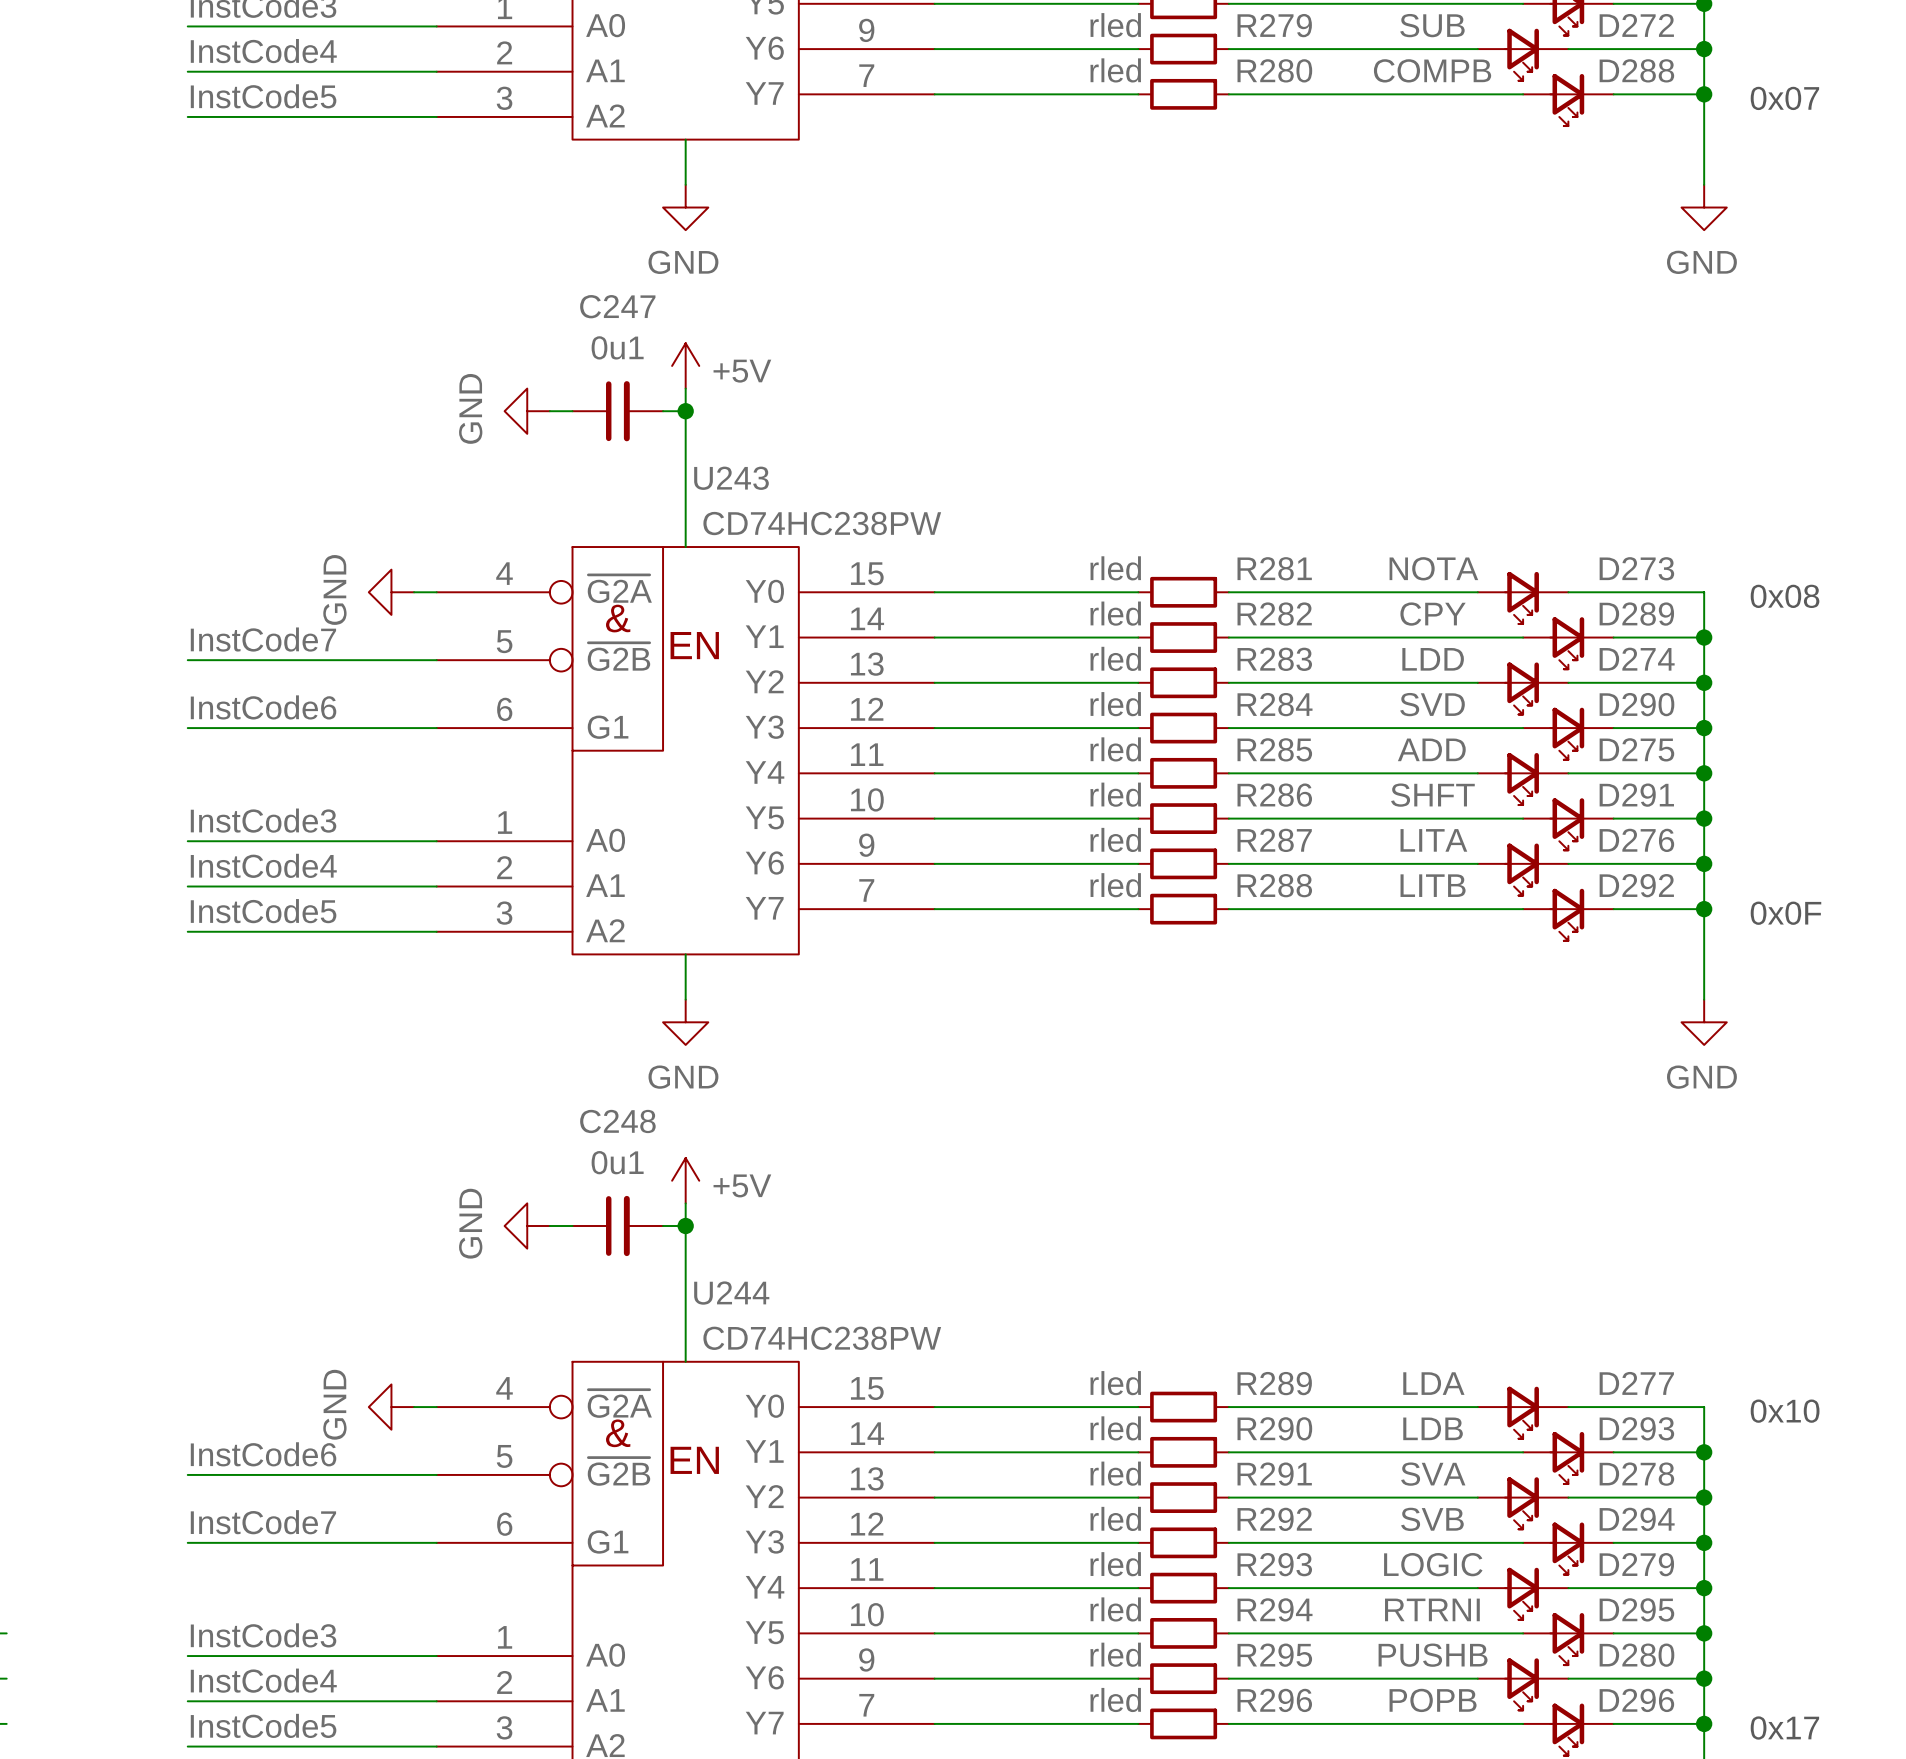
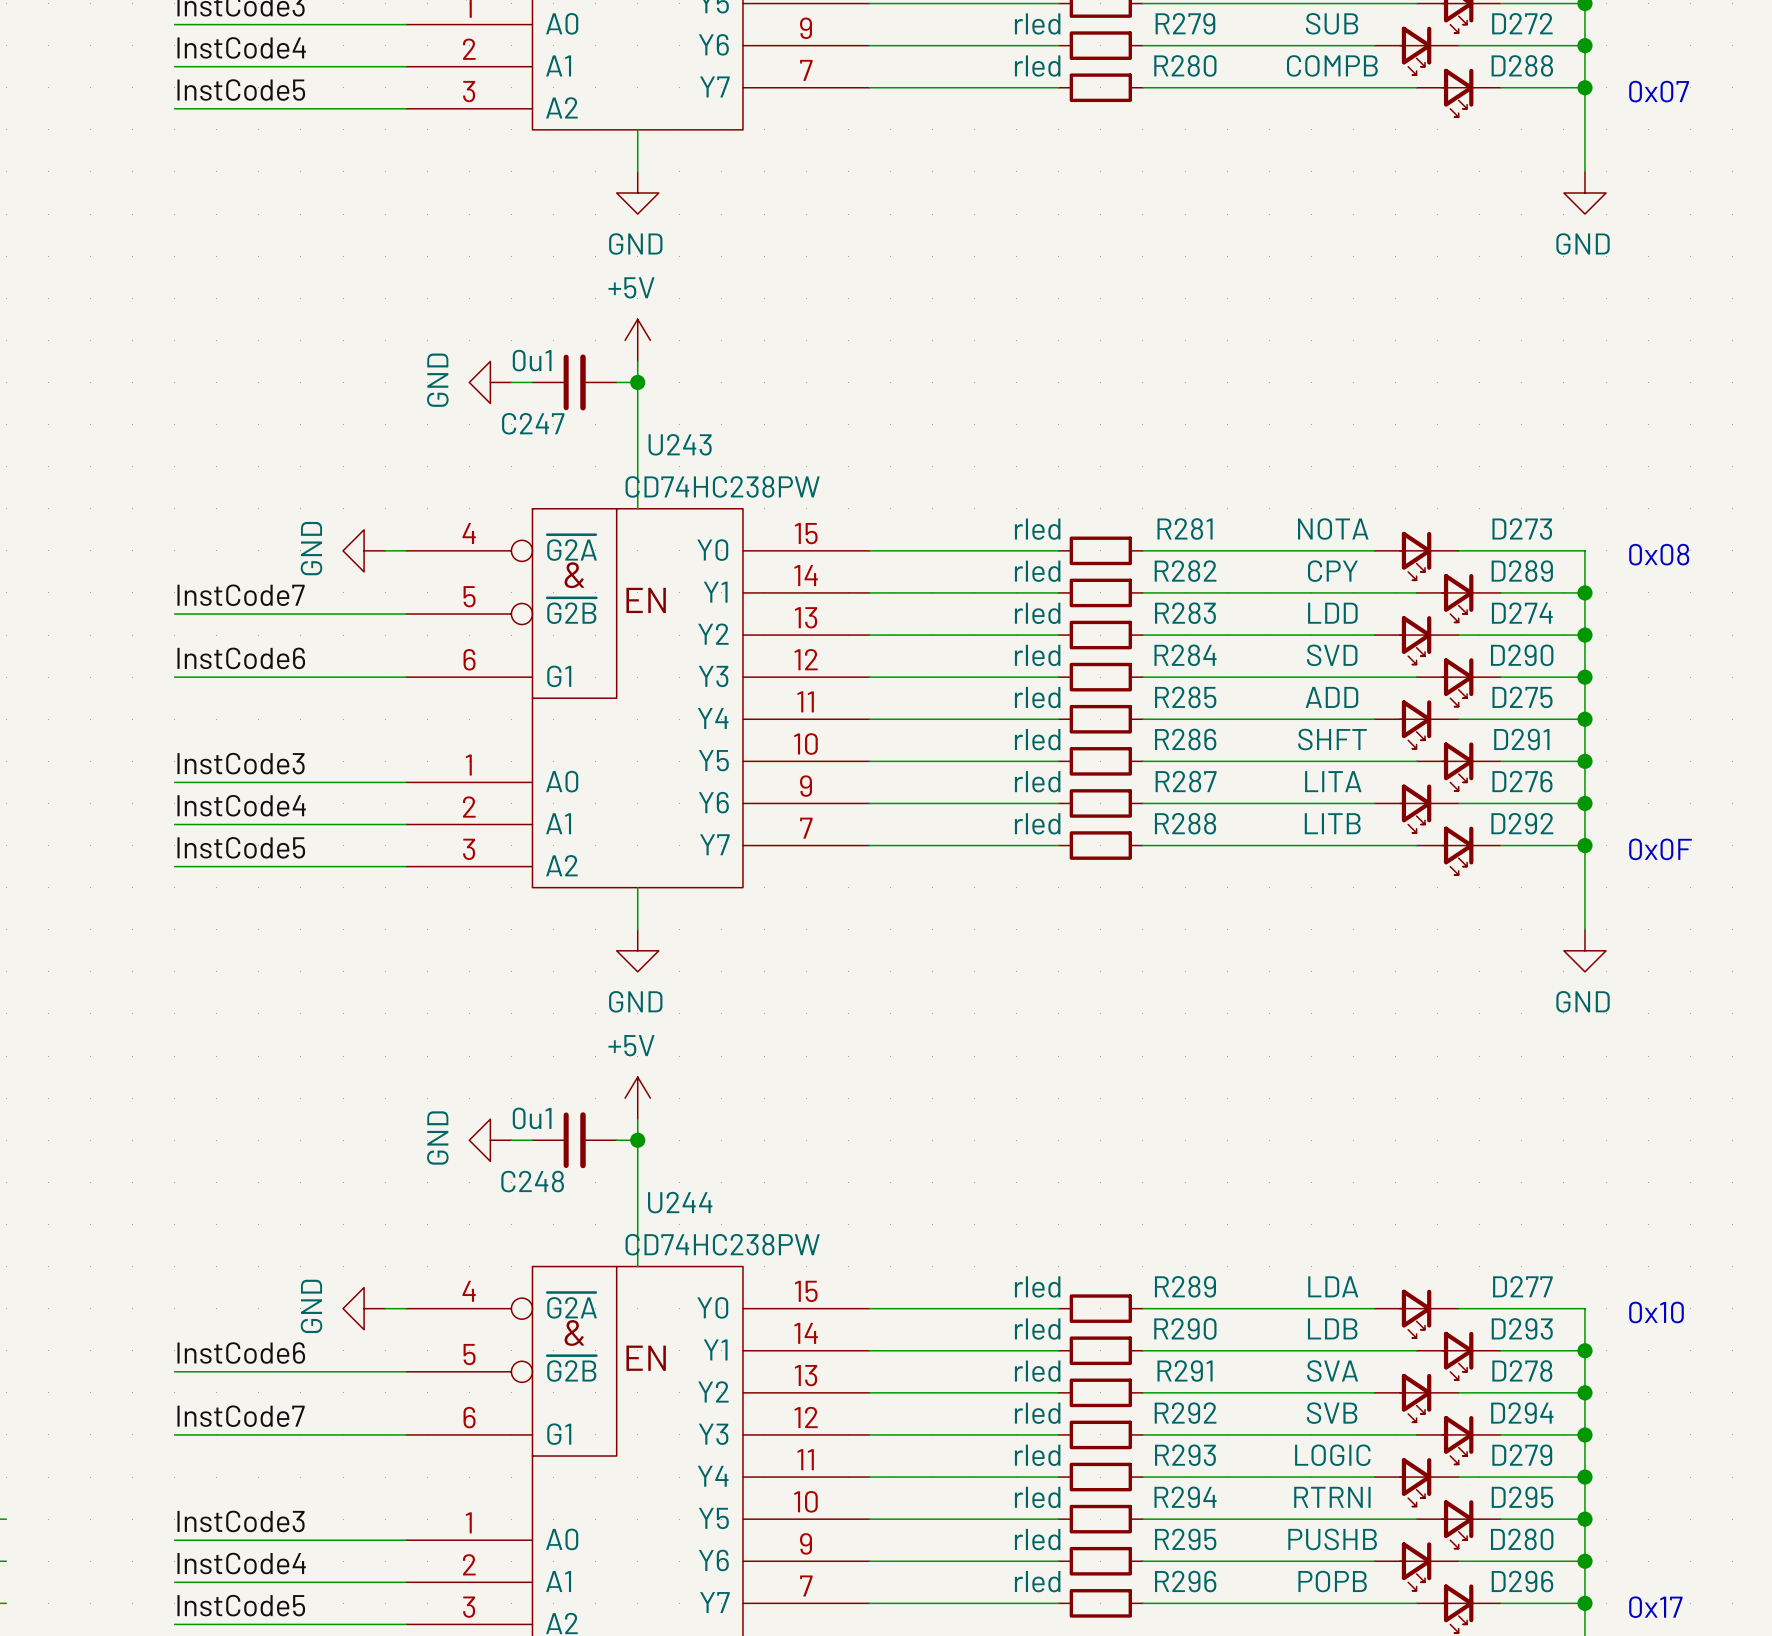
C247 name position: C247 (617, 306) -> C247 (533, 423)
C247 value position: 0u1 (617, 347) -> 0u1 (532, 360)
power symbol text position: +5V (742, 371) -> +5V (631, 287)
U243 value position: CD74HC238PW (822, 523) -> CD74HC238PW (722, 486)
C248 name position: C248 (617, 1121) -> C248 (532, 1181)
C248 value position: 0u1 (617, 1162) -> 0u1 (532, 1118)
power symbol text position: +5V (742, 1185) -> +5V (631, 1045)
U244 value position: CD74HC238PW (822, 1338) -> CD74HC238PW (722, 1244)

